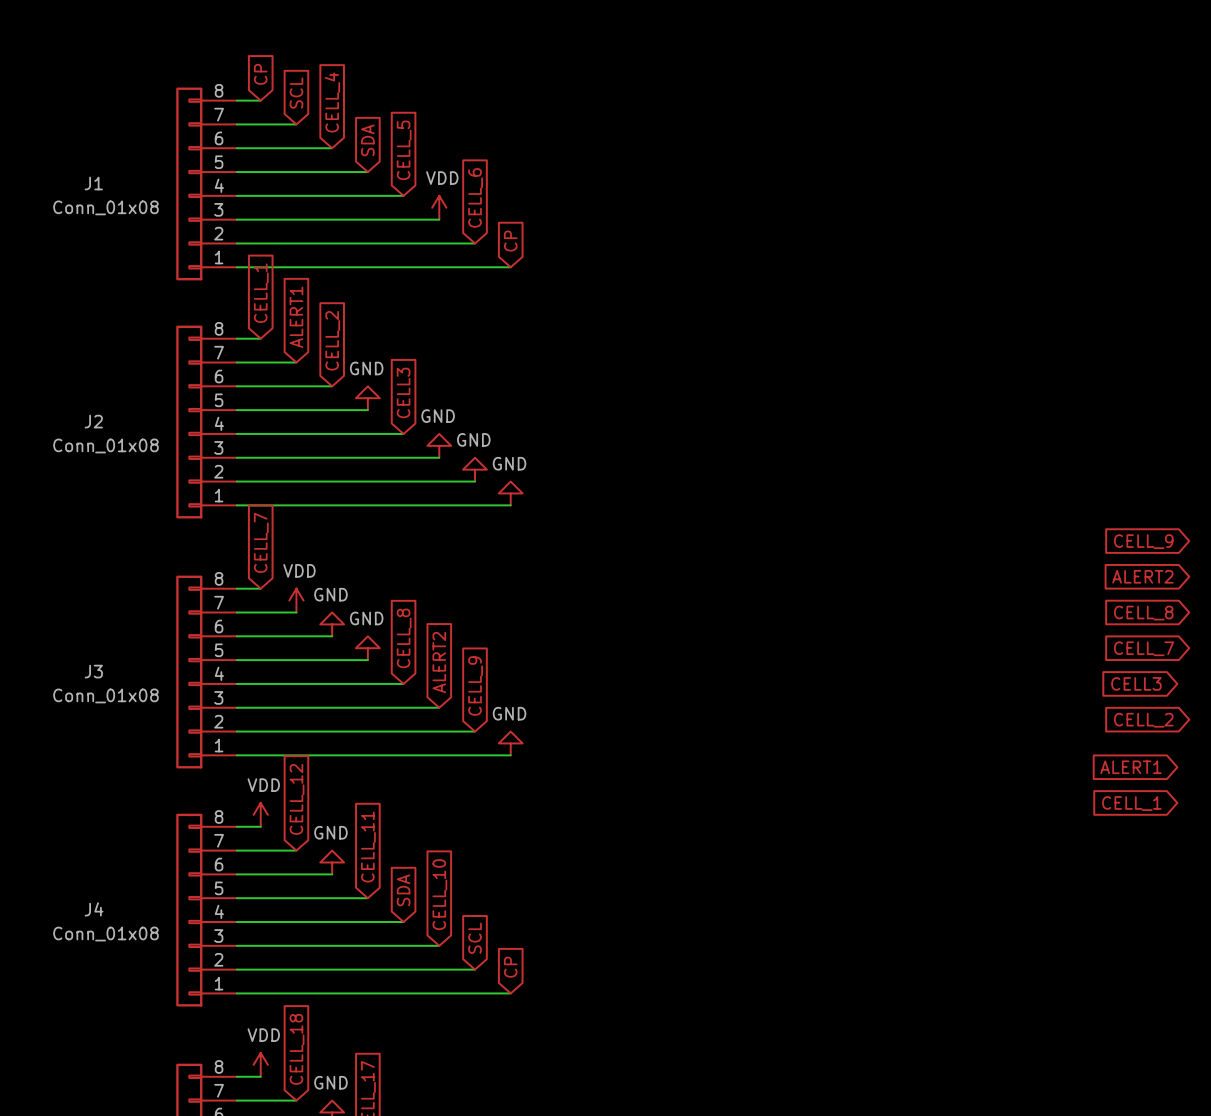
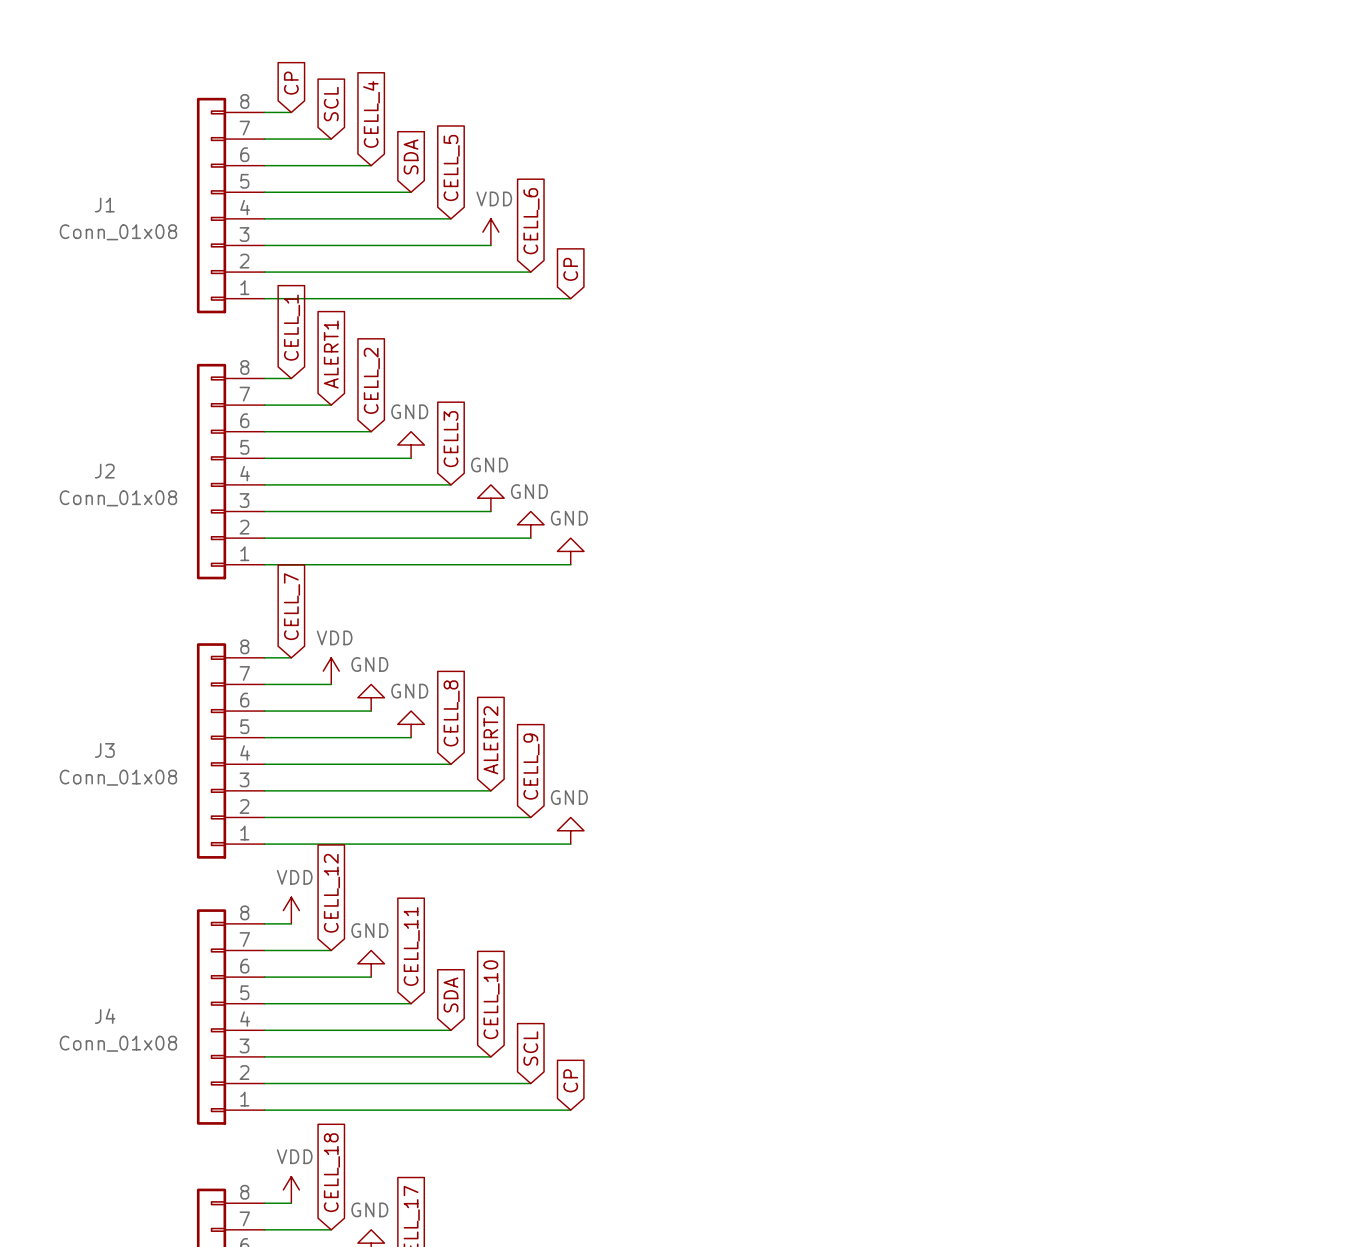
global label: CELL_9 (1143, 541) -> none
global label: ALERT2 (1142, 576) -> none
global label: CELL_8 (1143, 613) -> none
global label: CELL_7 (1144, 648) -> none
global label: CELL3 (1136, 683) -> none
global label: CELL_2 (1143, 720) -> none
global label: ALERT1 (1130, 767) -> none
global label: CELL_1 (1131, 803) -> none

